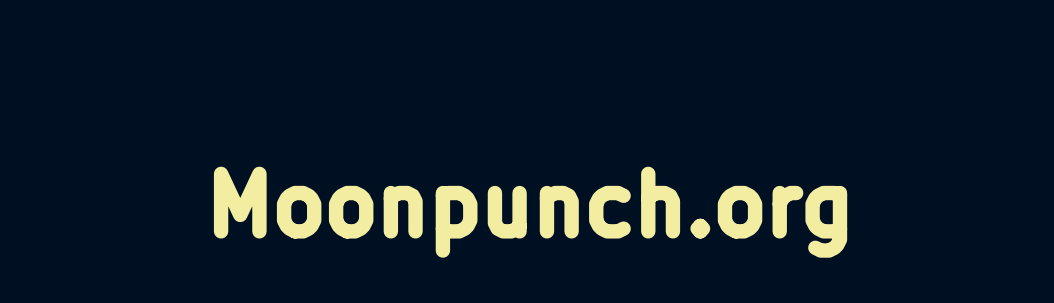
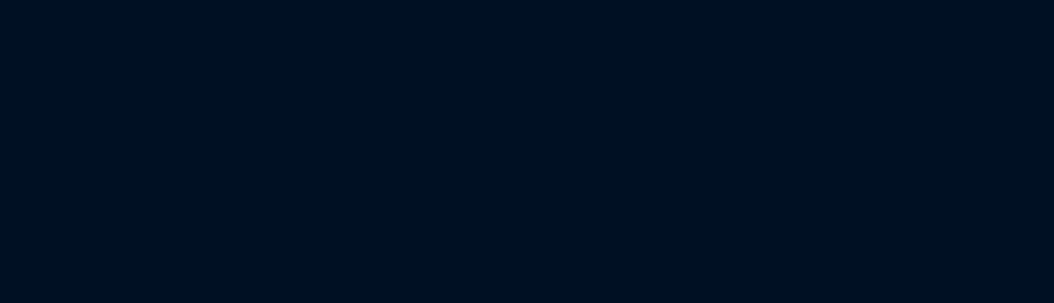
text: Moonpunch.org (530, 212) -> none

